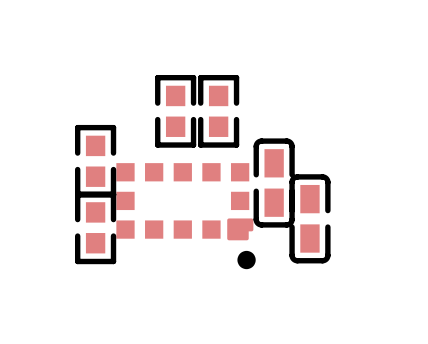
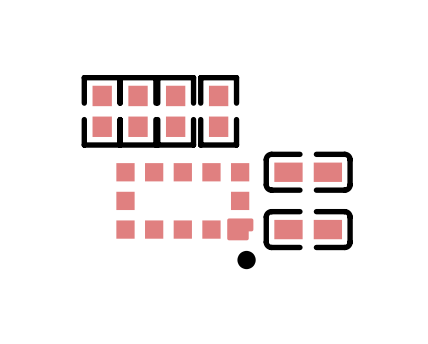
part: none -> (102, 111)
part: none -> (138, 111)
part: (95, 161) -> none
part rotation: 0° (274, 183) -> 90° clockwise (308, 172)
part rotation: 0° (309, 218) -> 90° clockwise (308, 229)
part: (95, 227) -> none

